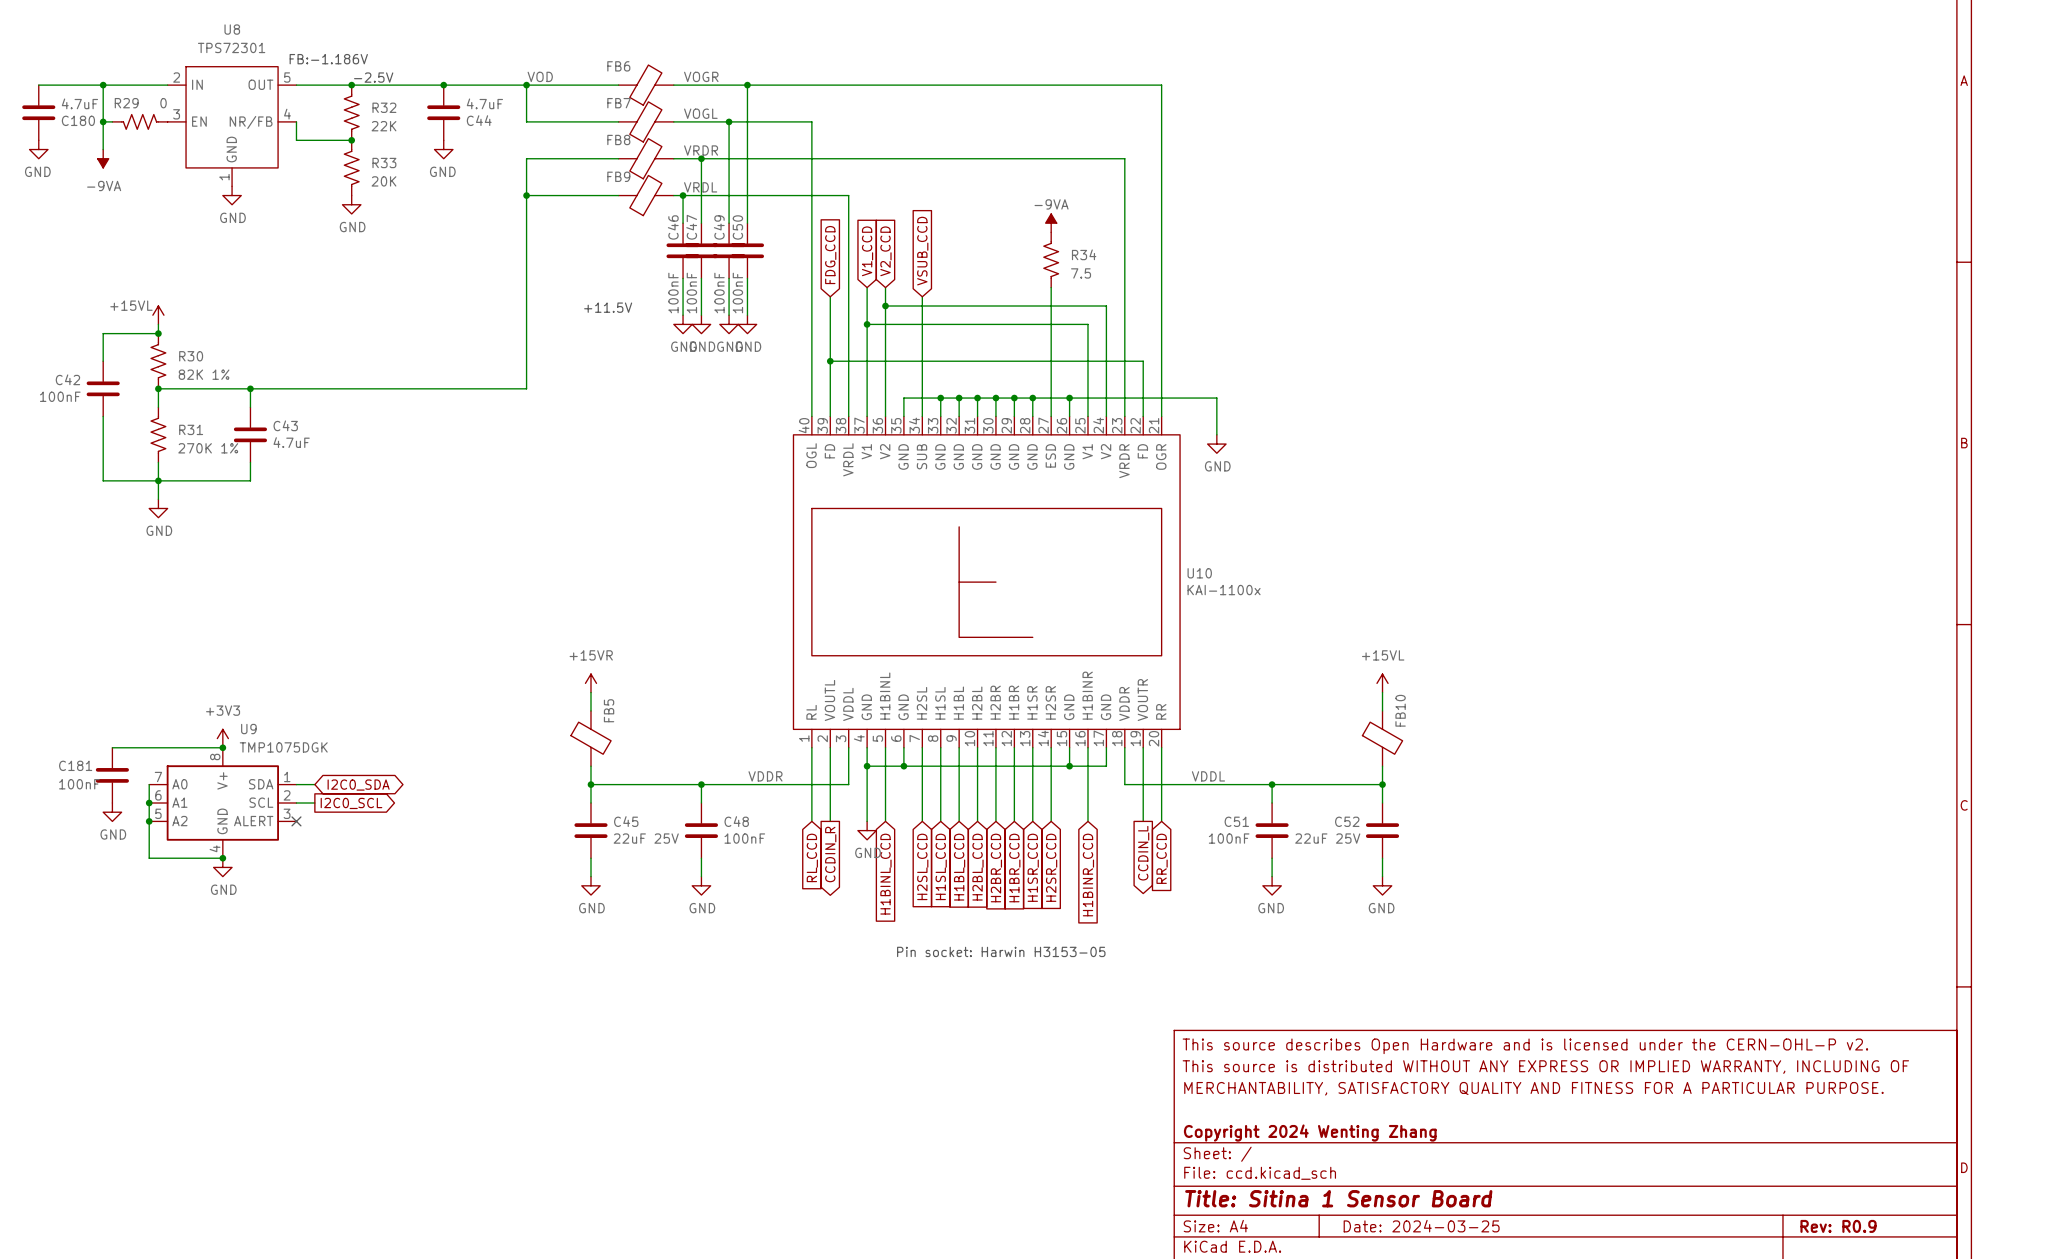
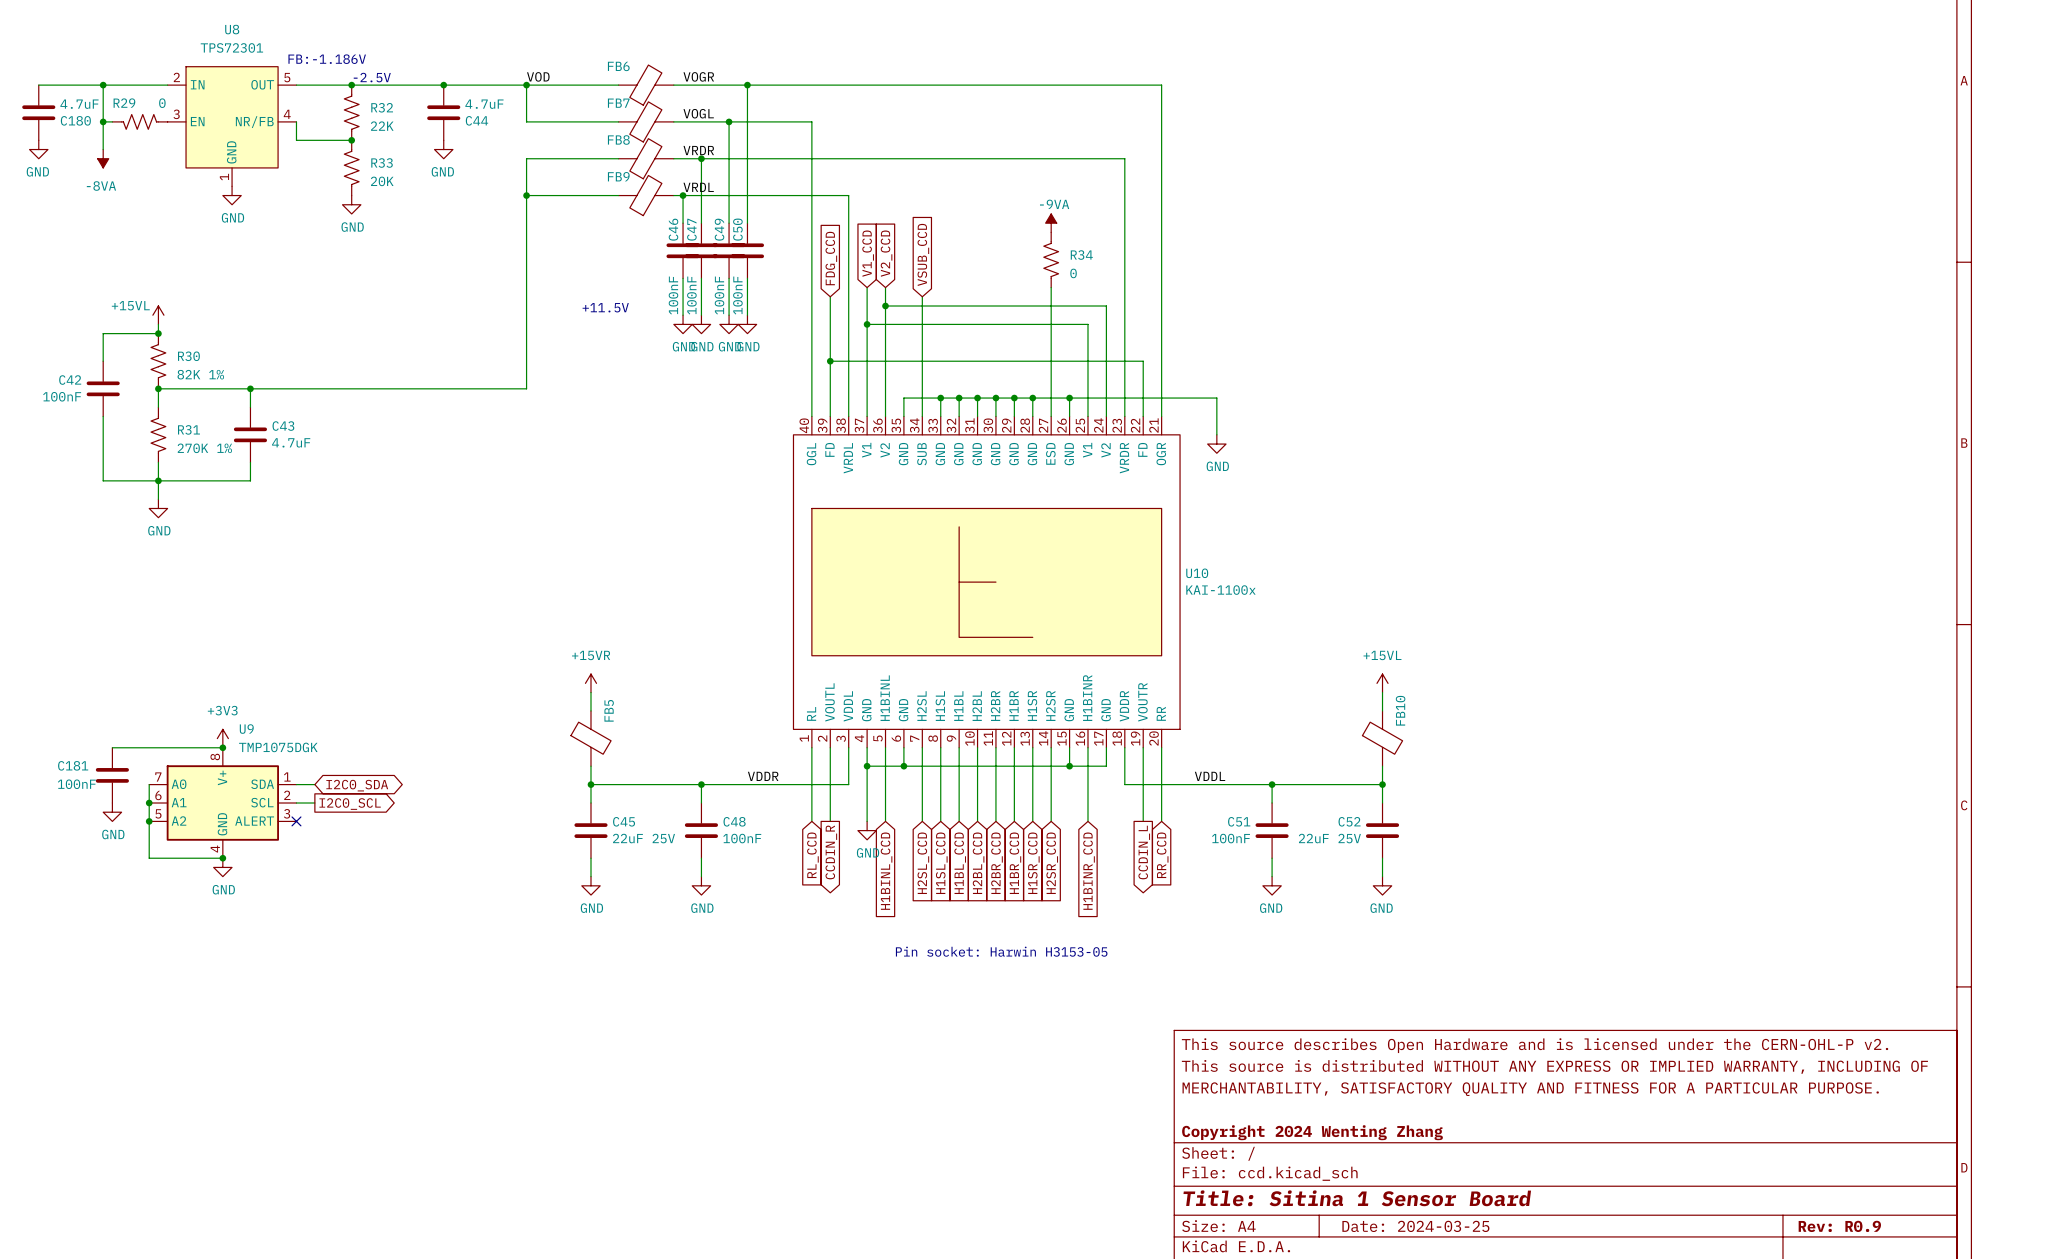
power symbol: -9VA (103, 158) -> -8VA (103, 158)
R34 value: 7.5 (1081, 273) -> 0 (1073, 273)

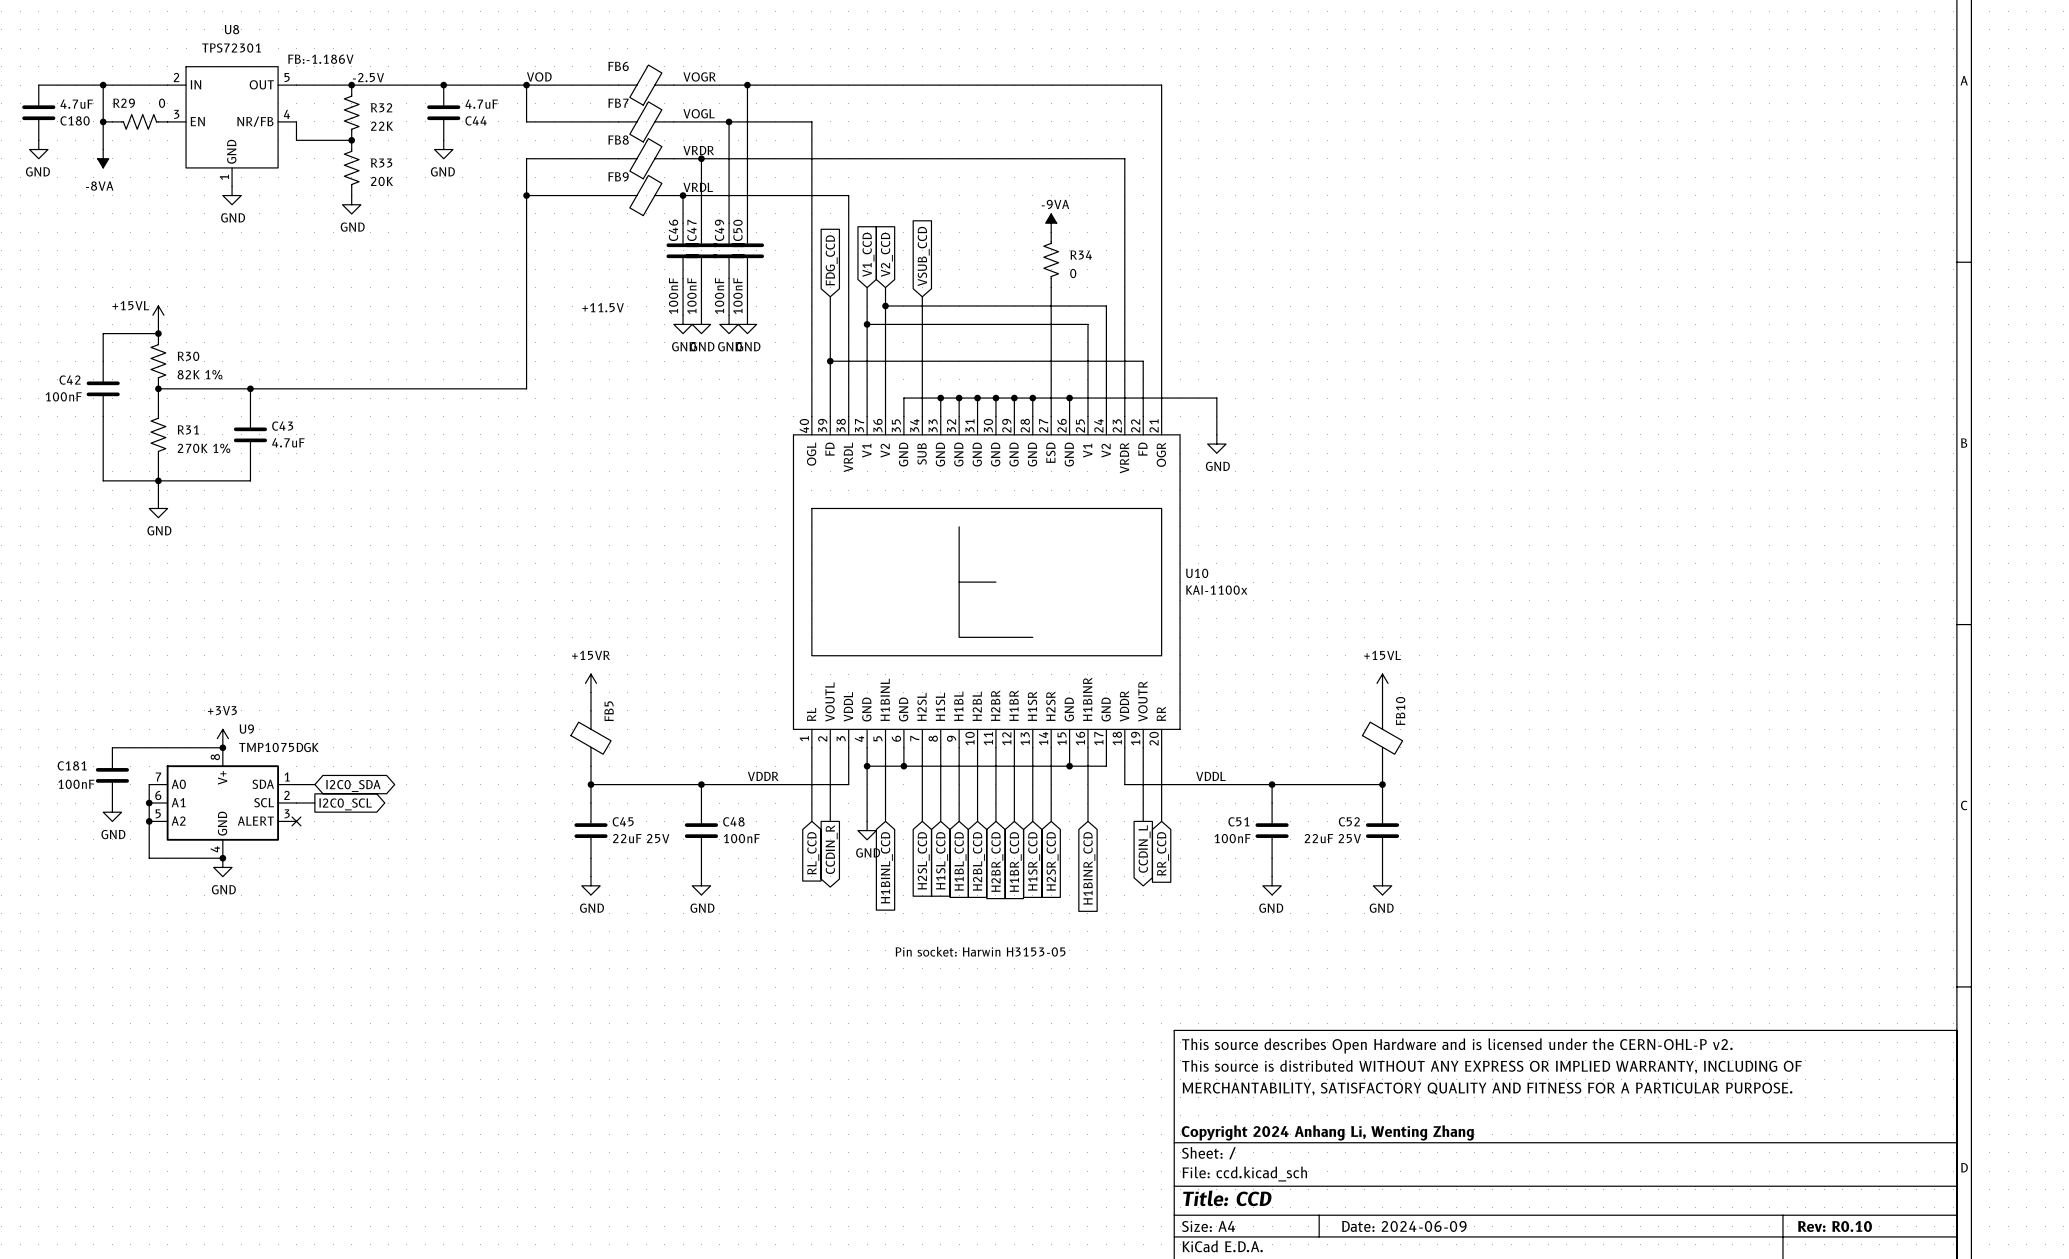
title block: Copyright 2024 Wenting Zhang (1312, 1132) -> Copyright 2024 Anhang Li, Wenting Zhang (1327, 1132)
title block: Title: Sitina 1 Sensor Board (1357, 1198) -> Title: CCD (1227, 1198)
title block: Date: 2024-03-25 (1415, 1226) -> Date: 2024-06-09 (1404, 1226)
title block: Rev: R0.9 (1839, 1226) -> Rev: R0.10 (1835, 1226)

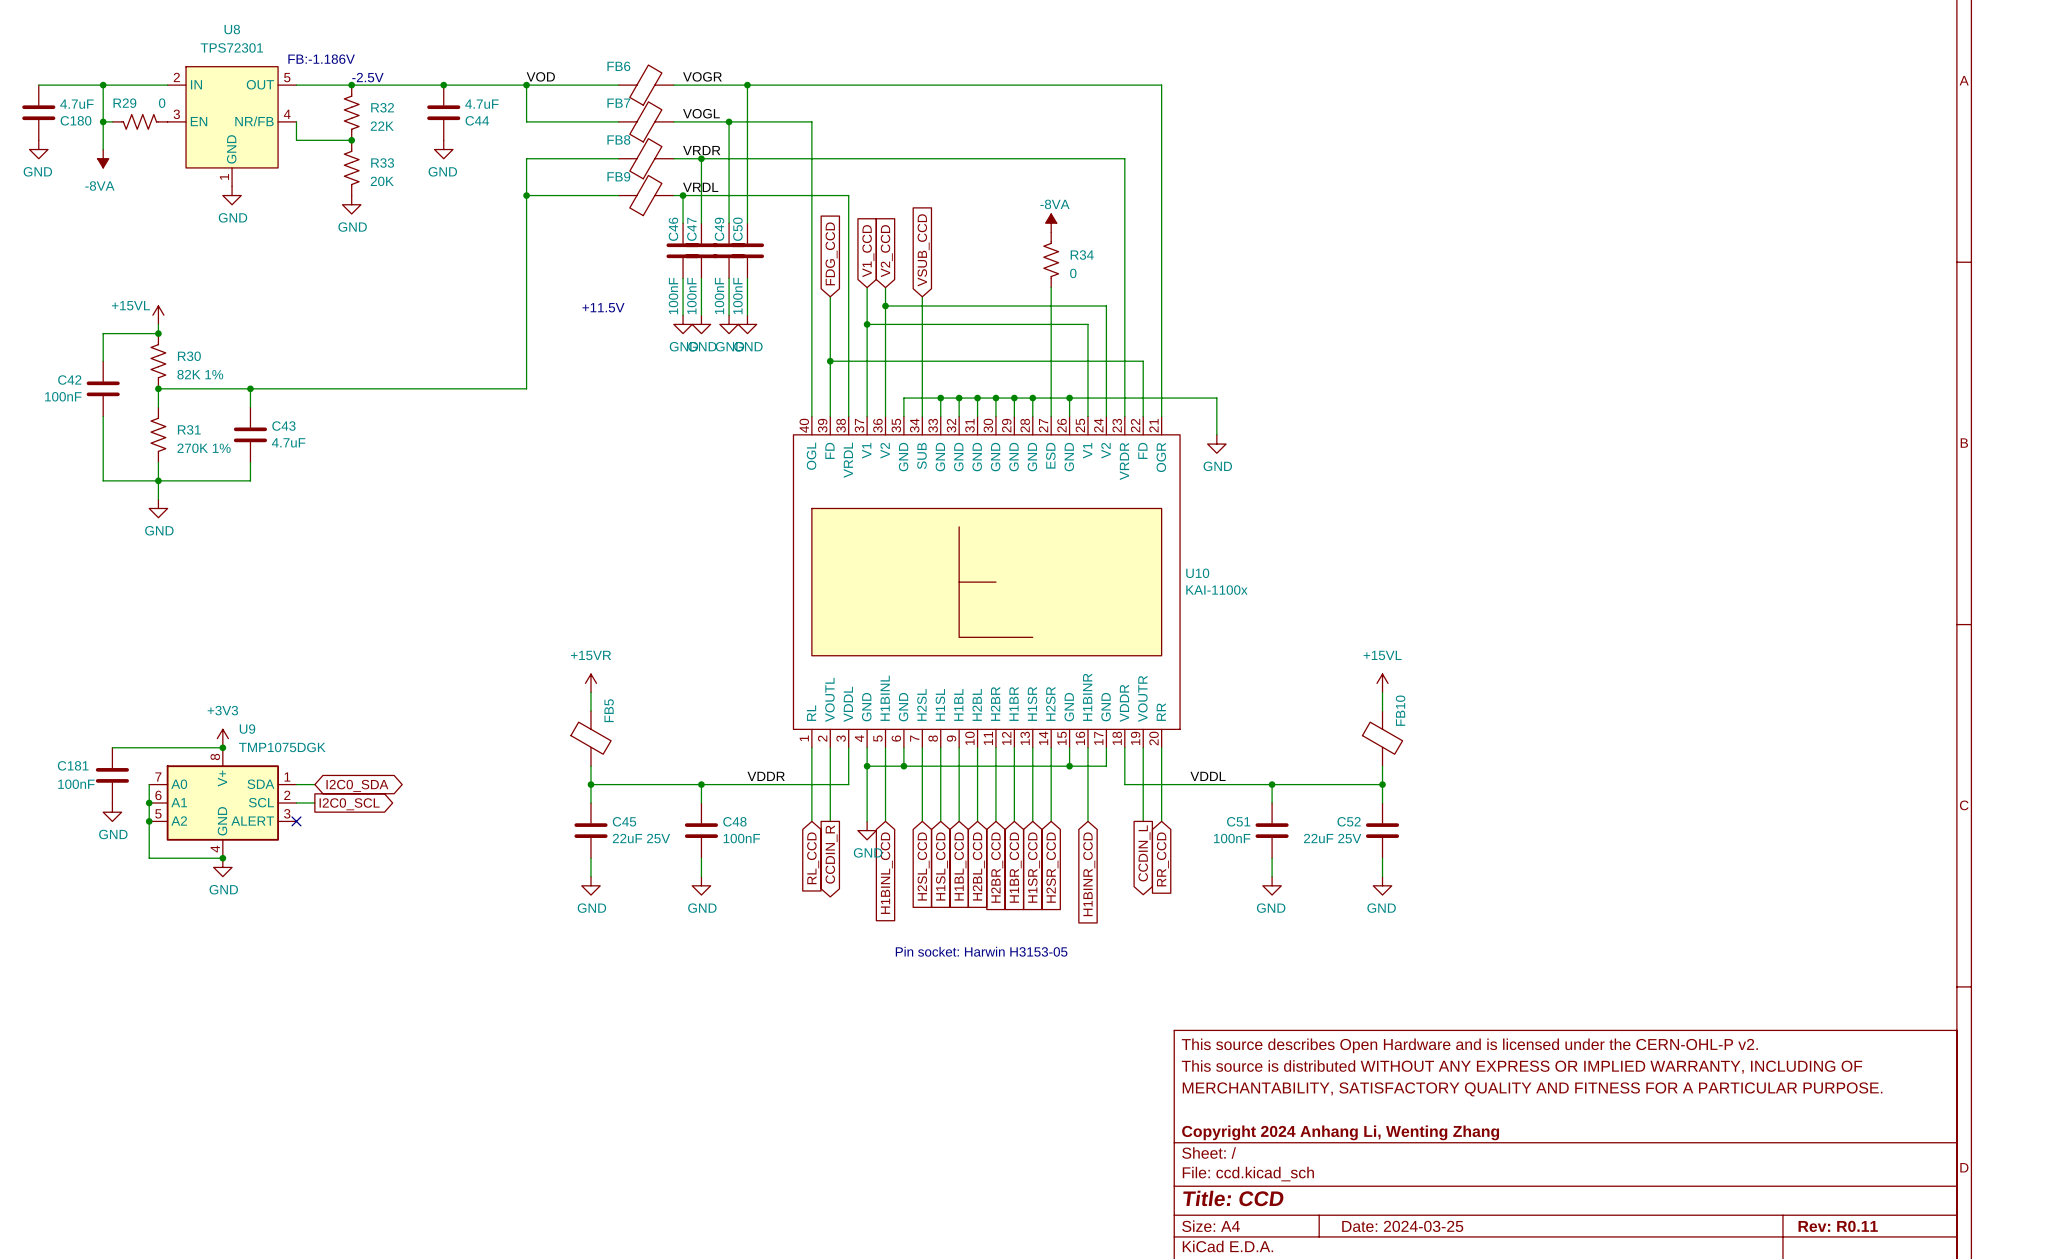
power symbol: -9VA (1051, 223) -> -8VA (1051, 223)
title block: Date: 2024-06-09 (1404, 1226) -> Date: 2024-03-25 (1402, 1226)
title block: Rev: R0.10 (1835, 1226) -> Rev: R0.11 (1838, 1226)

